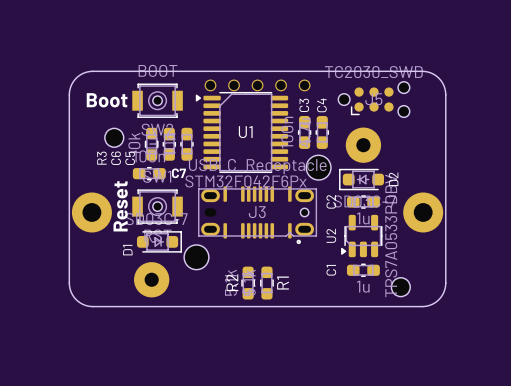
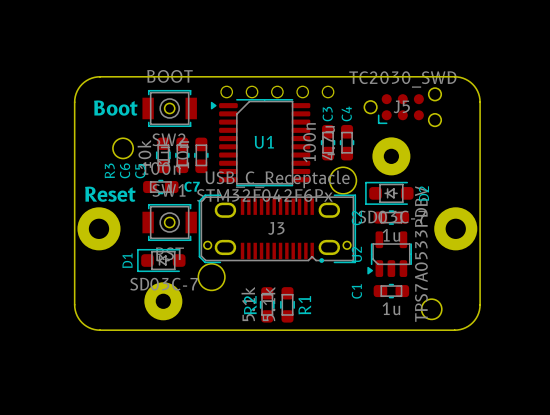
J3 footprint: [198, 186, 317, 245] -> [198, 194, 357, 264]
text rotation: 0° (120, 206) -> 90° clockwise (110, 194)
D1 rotation: 0° (159, 241) -> 180° (161, 260)

